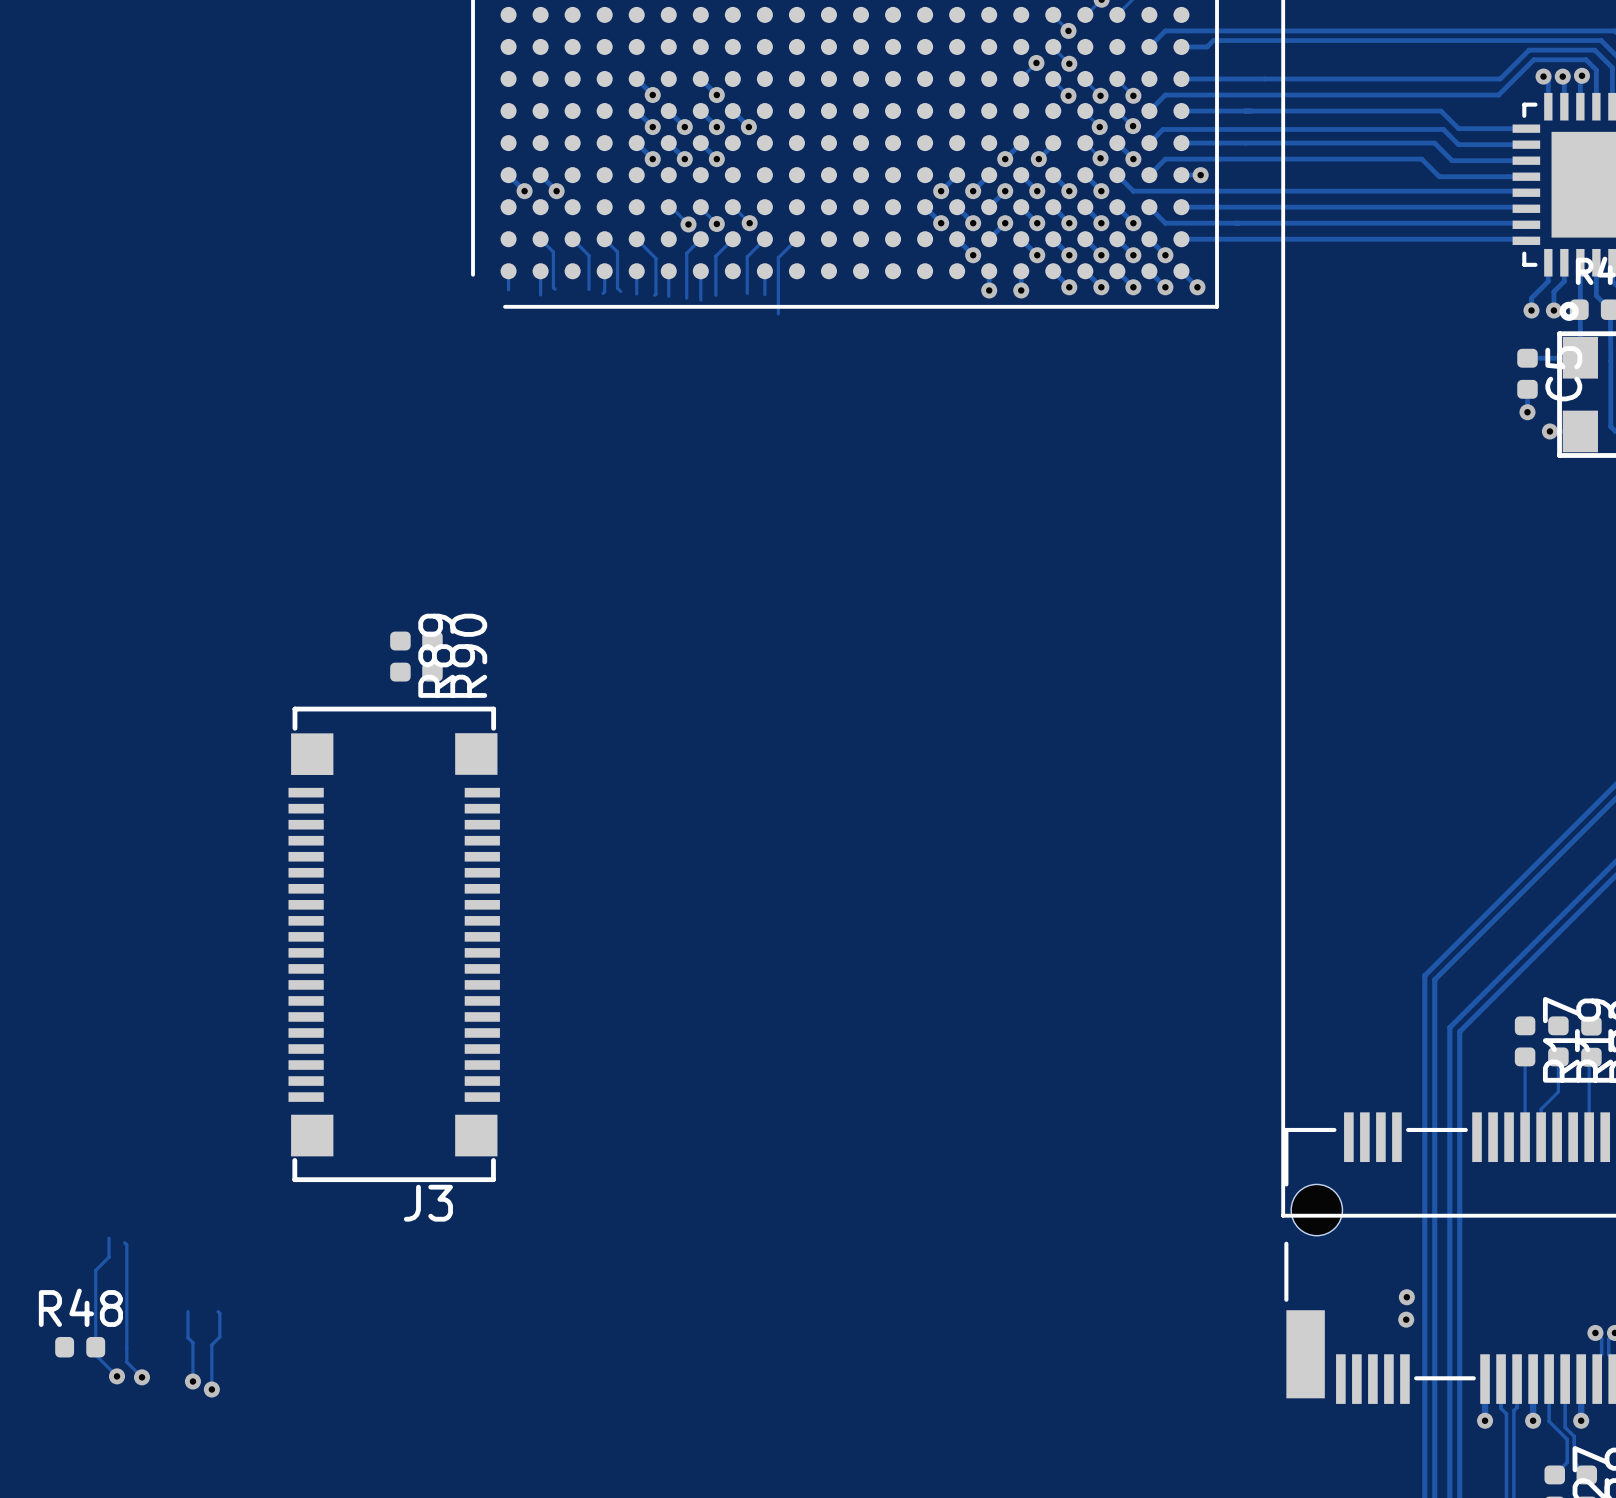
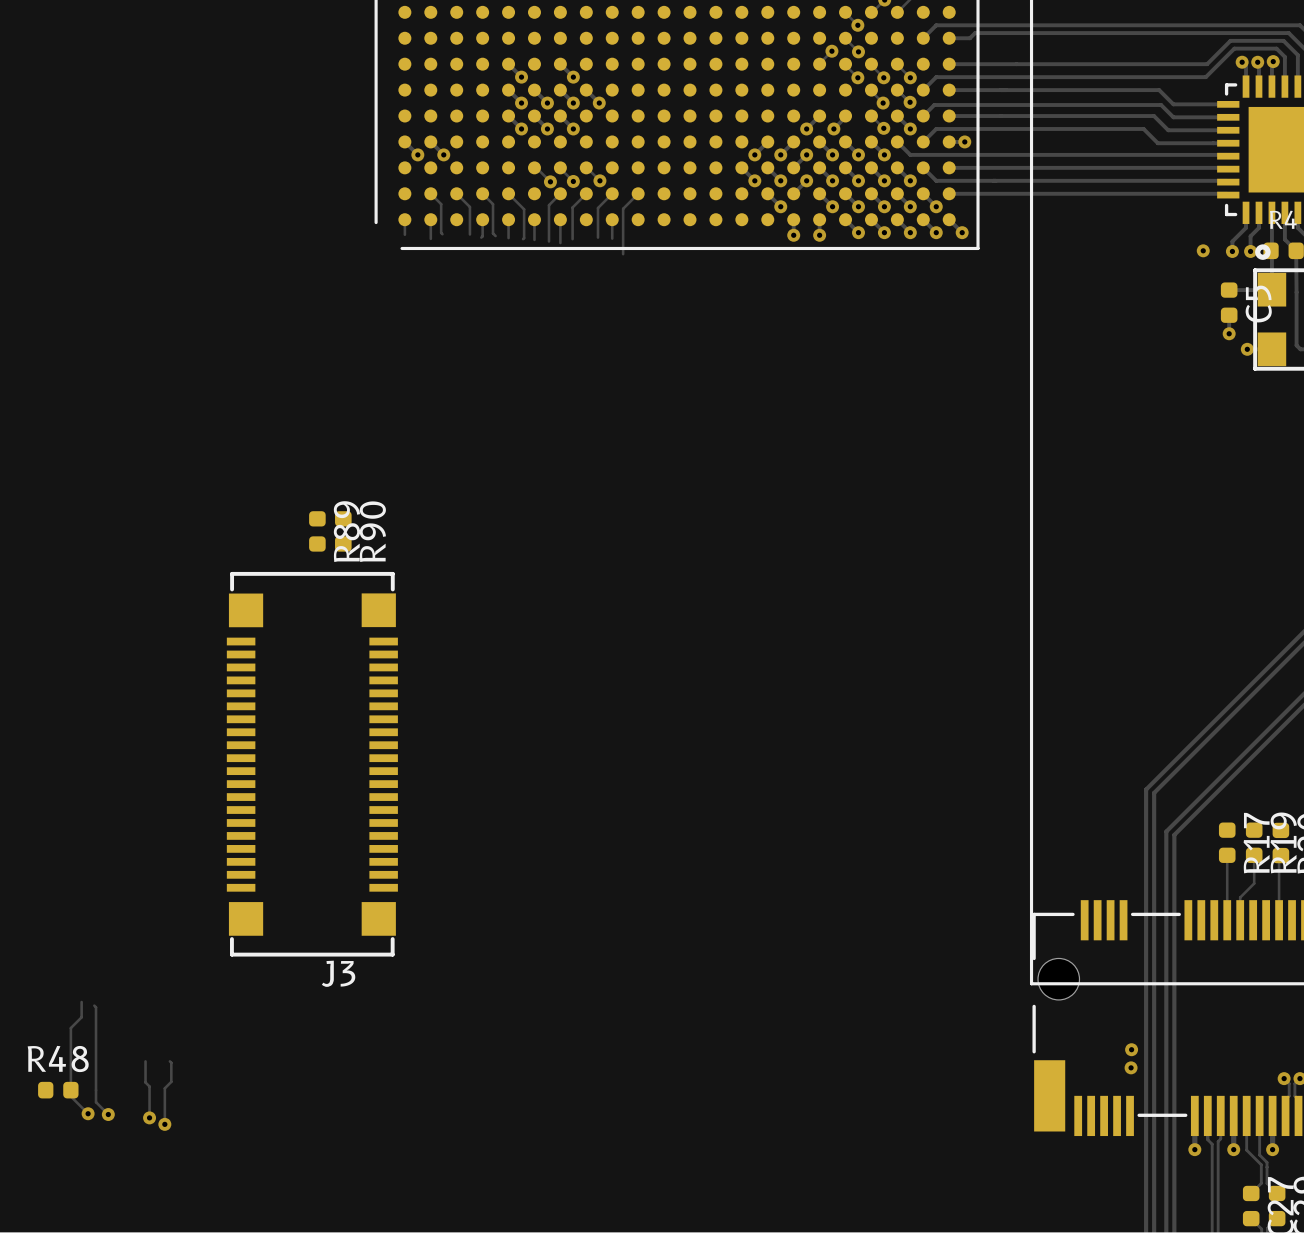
via: none -> (1203, 250)

